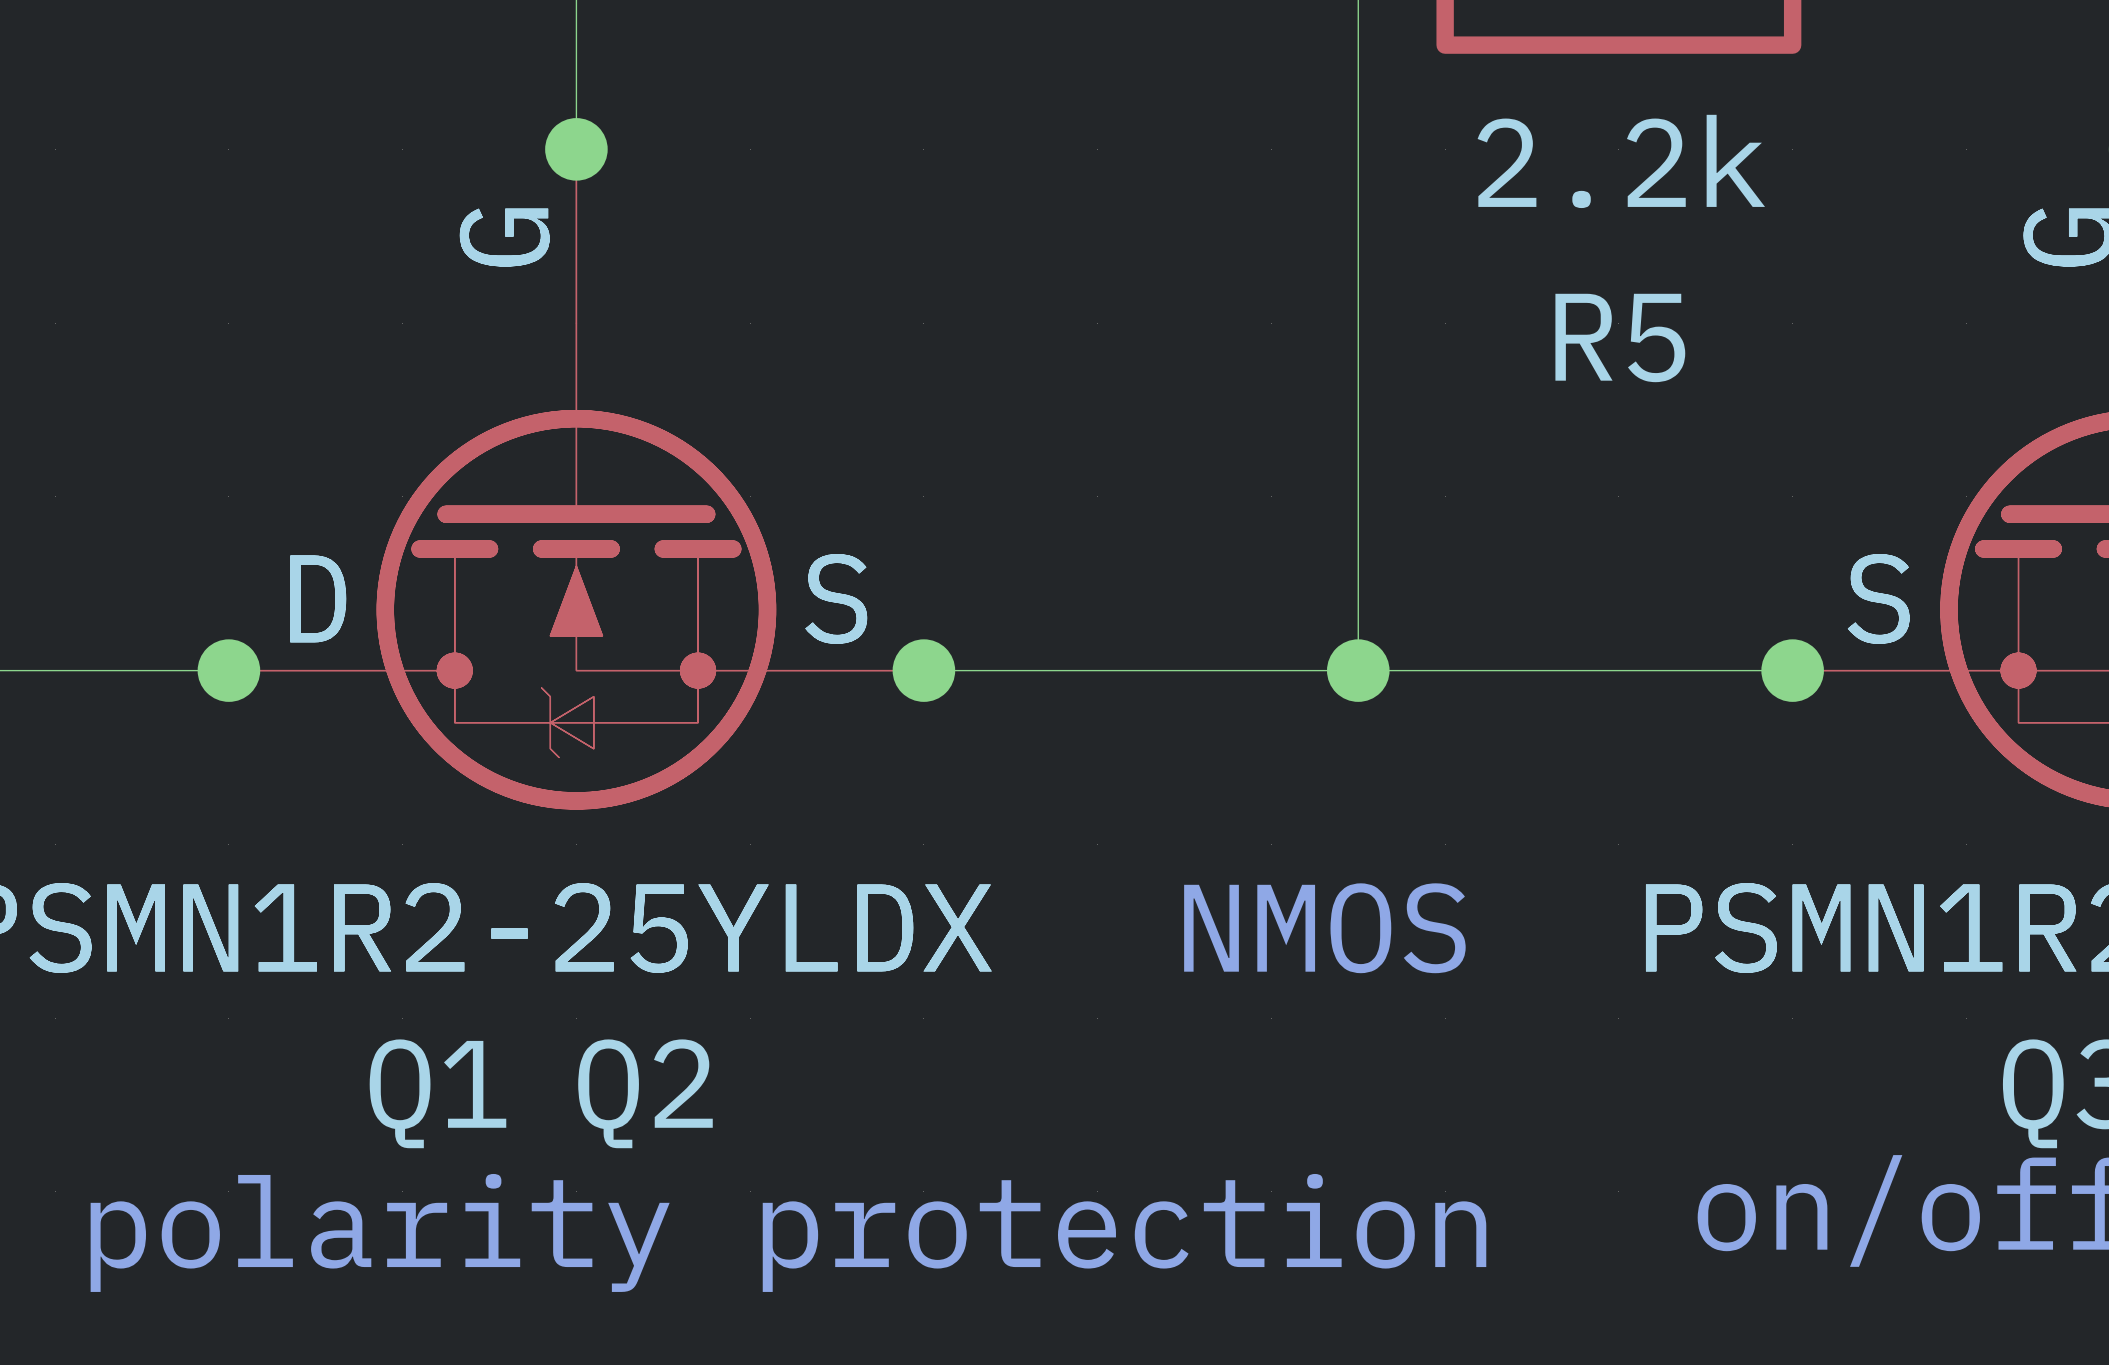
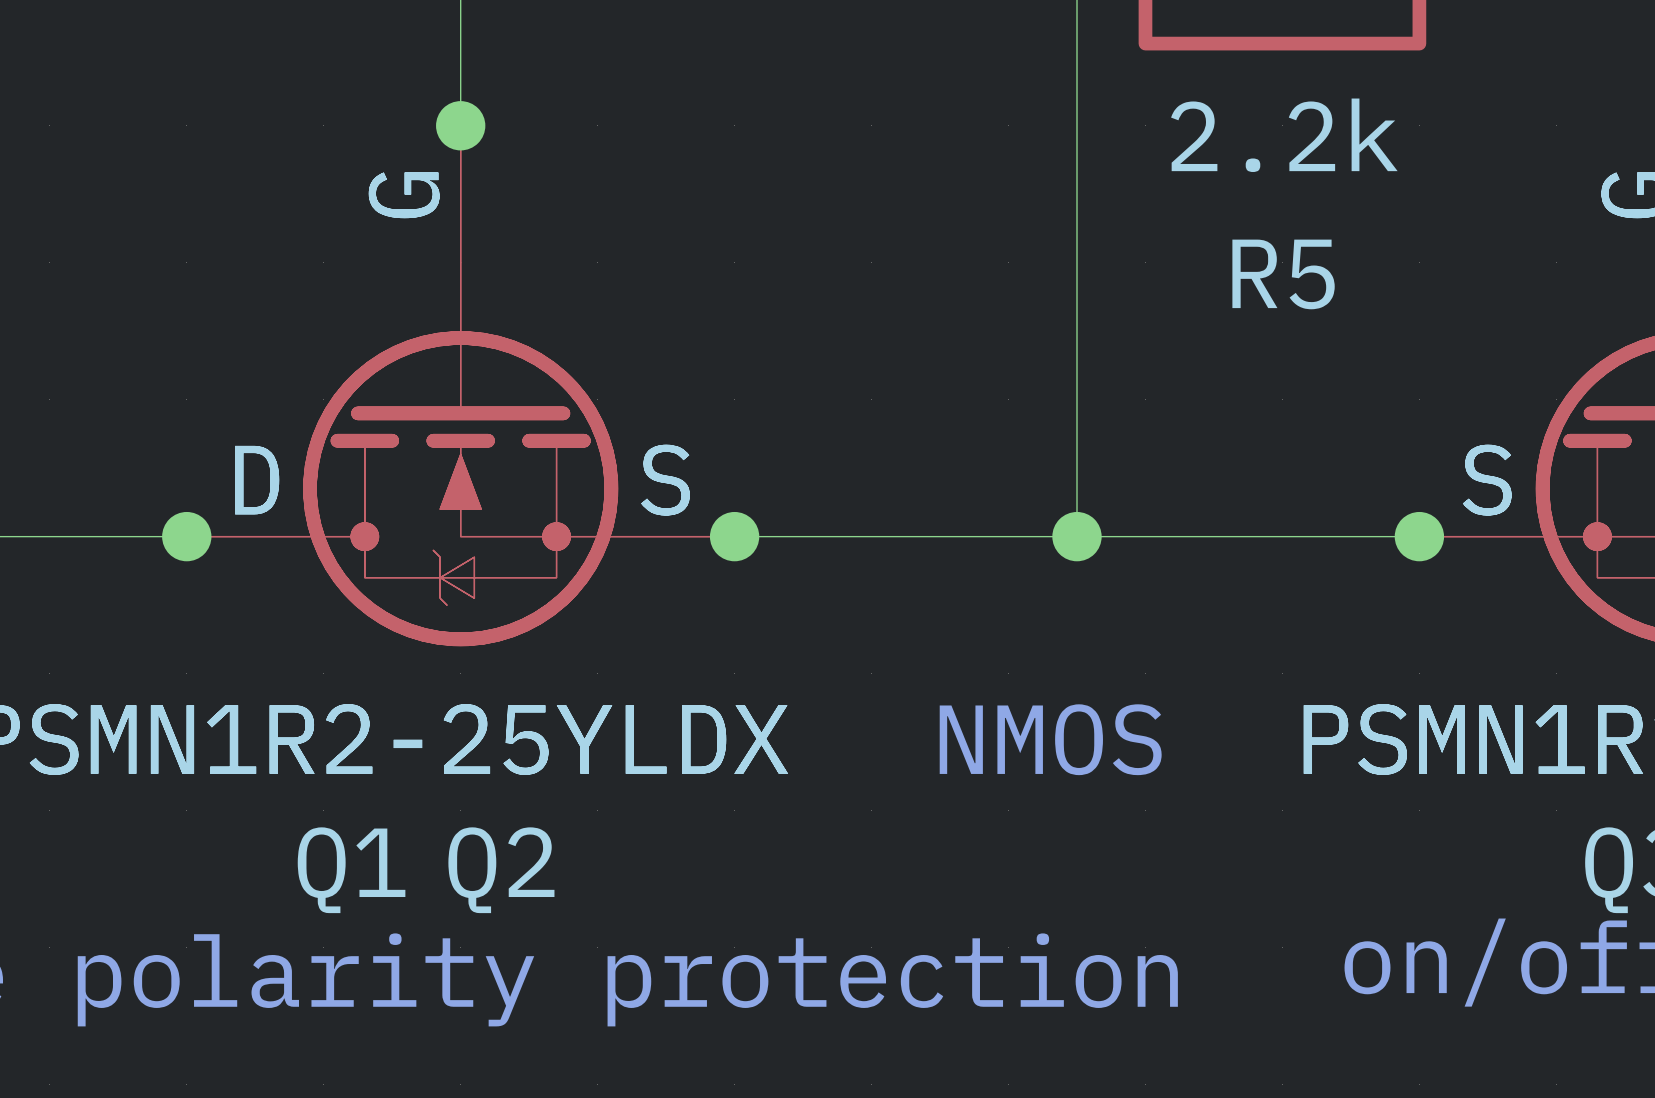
Q2 name position: Q2 (645, 1093) -> Q2 (501, 870)

